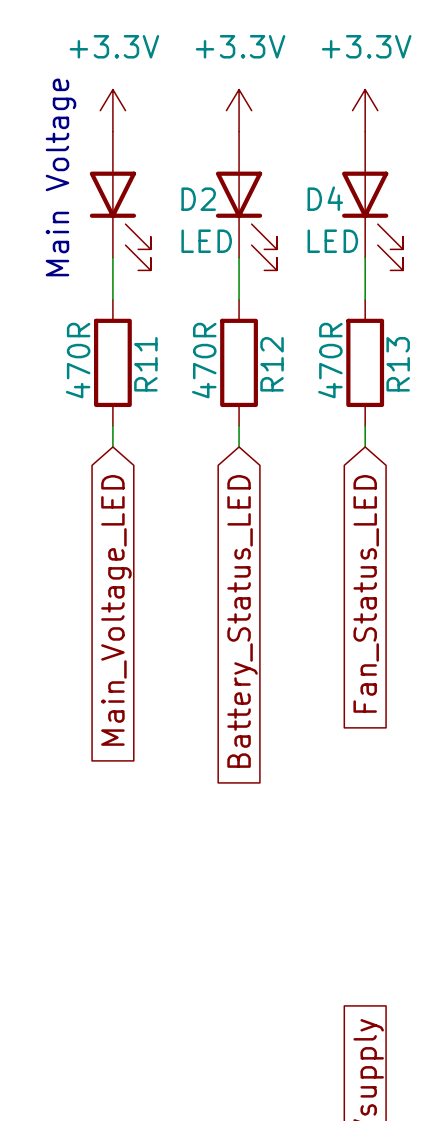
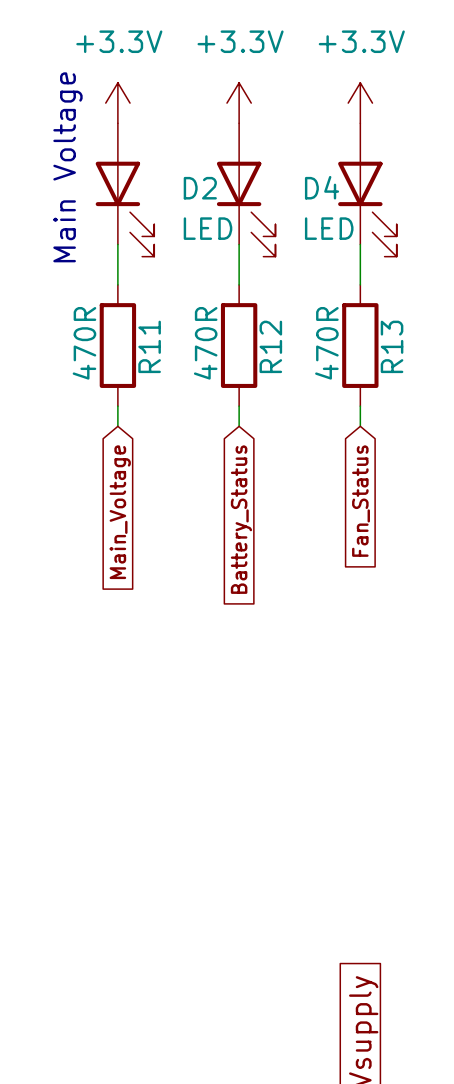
global label: Fan_Status_LED (366, 593) -> Fan_Status (361, 501)
global label: Main_Voltage_LED (116, 610) -> Main_Voltage (120, 512)
global label: Battery_Status_LED (242, 621) -> Battery_Status (241, 519)

